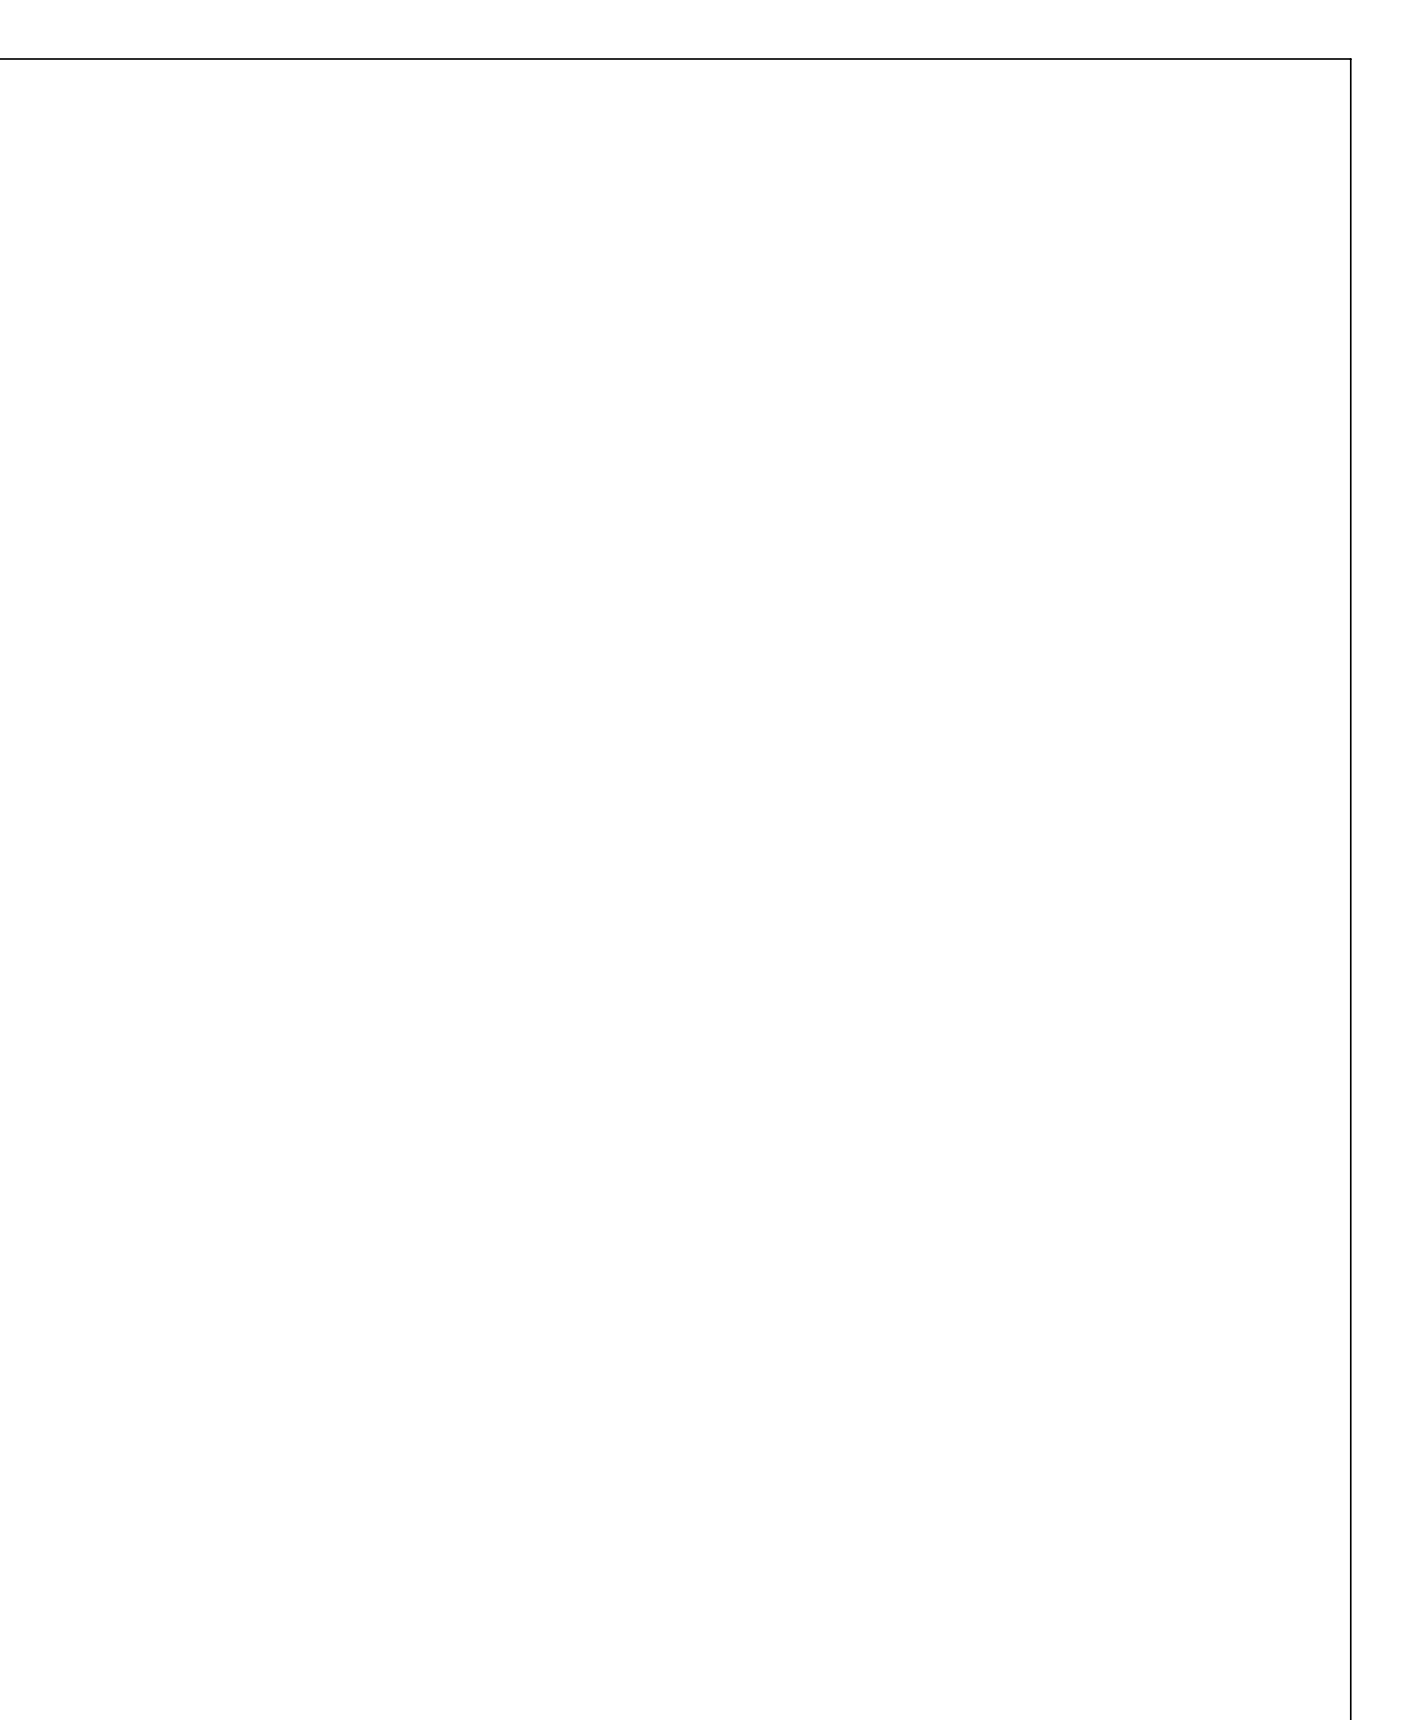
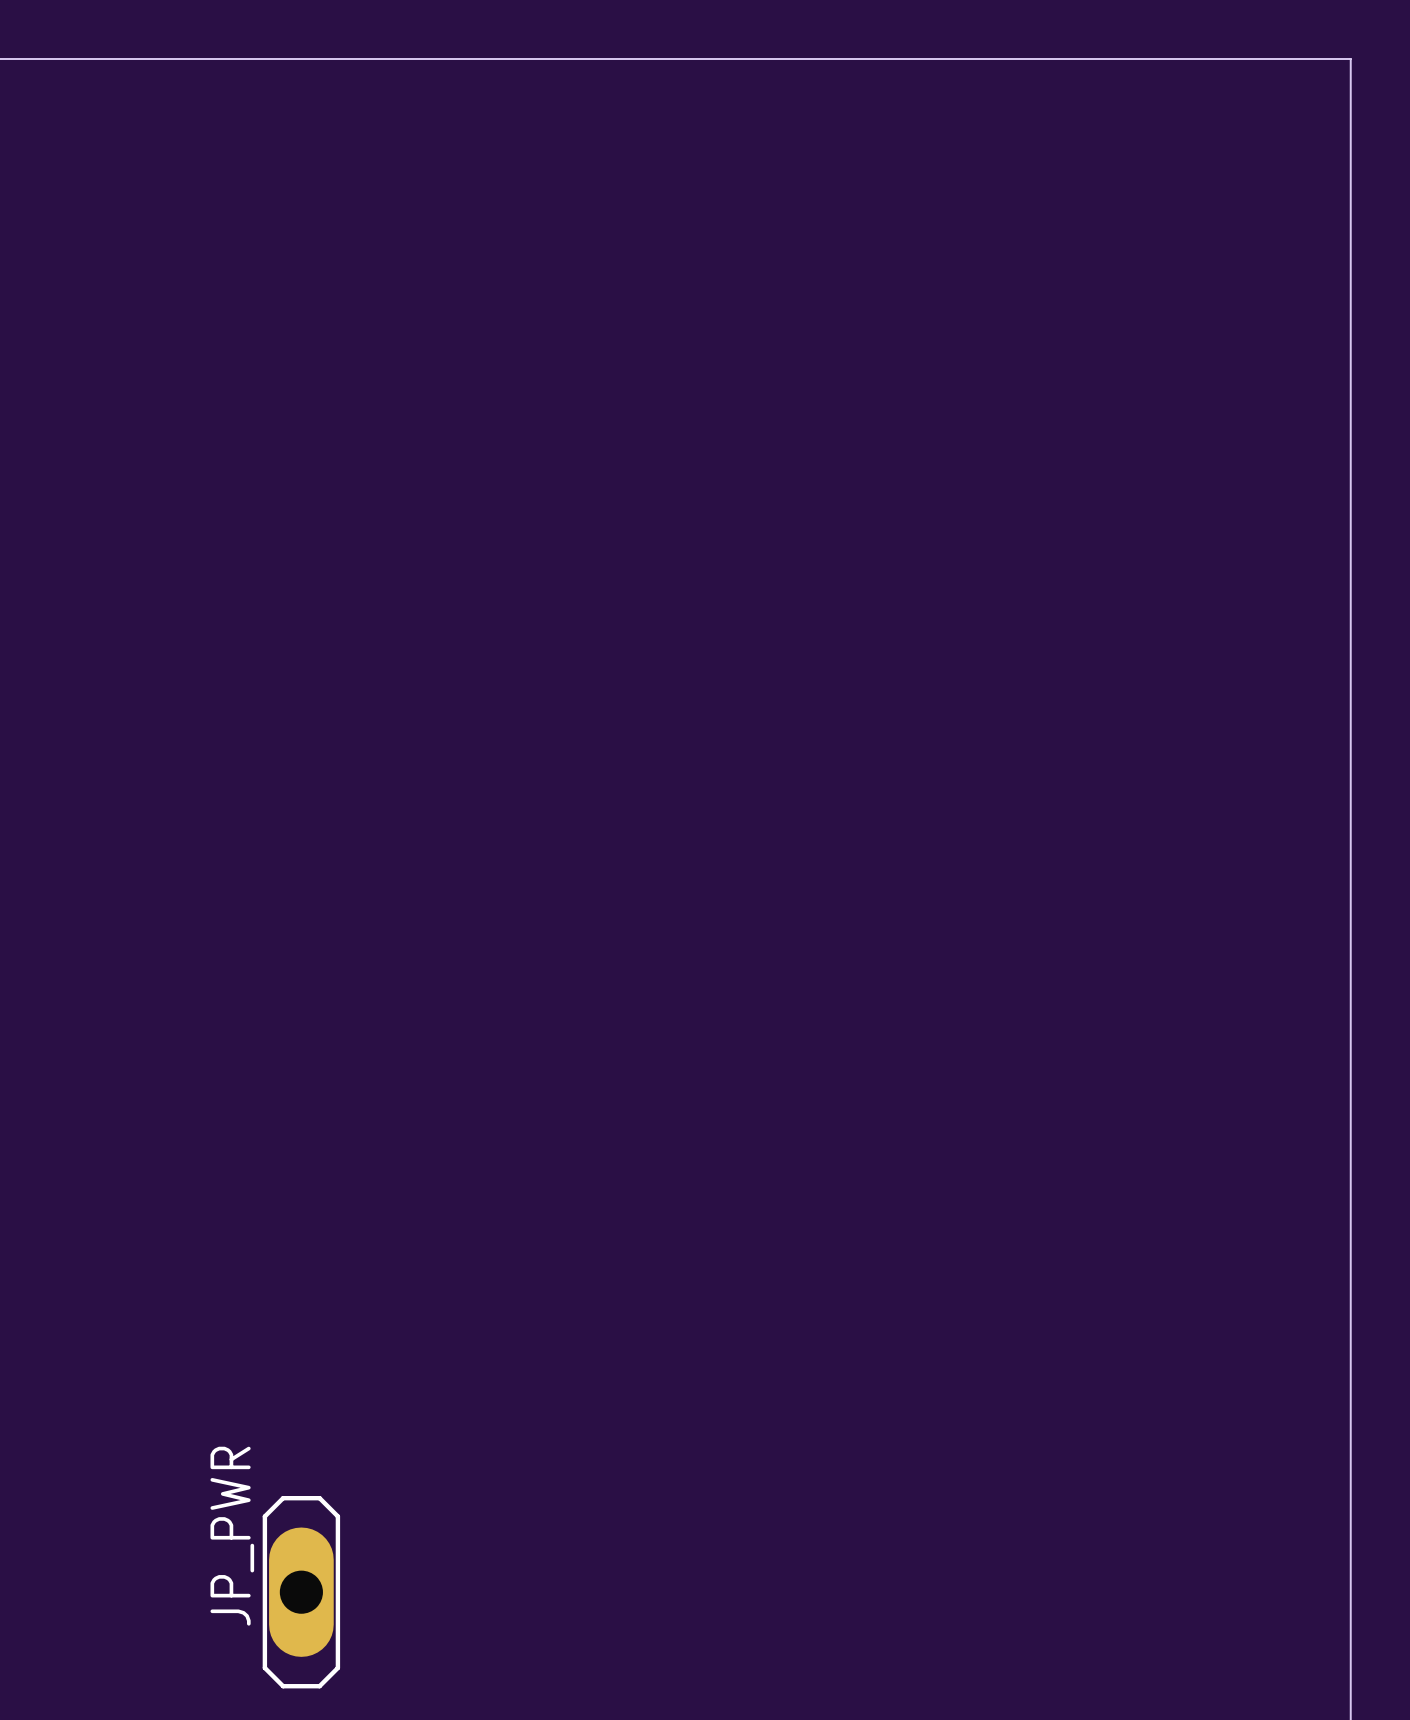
JP_PWR: none -> (301, 1592)

